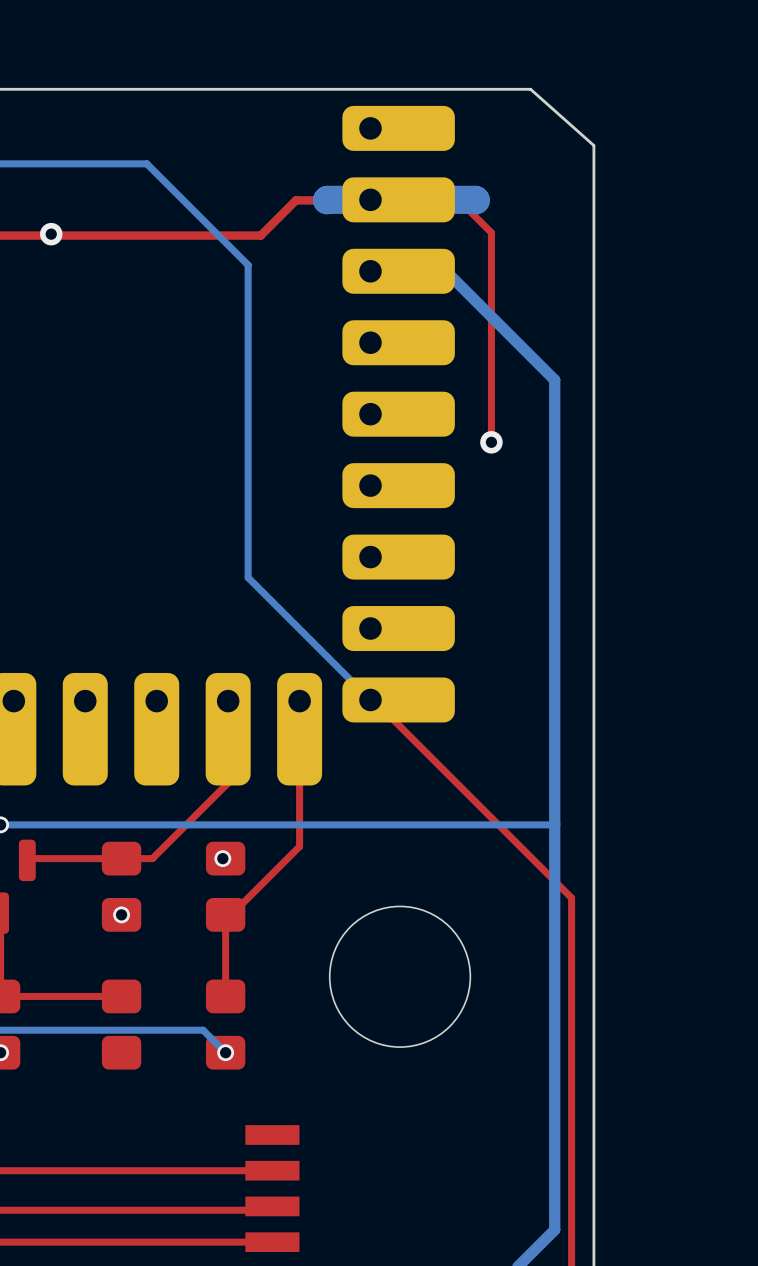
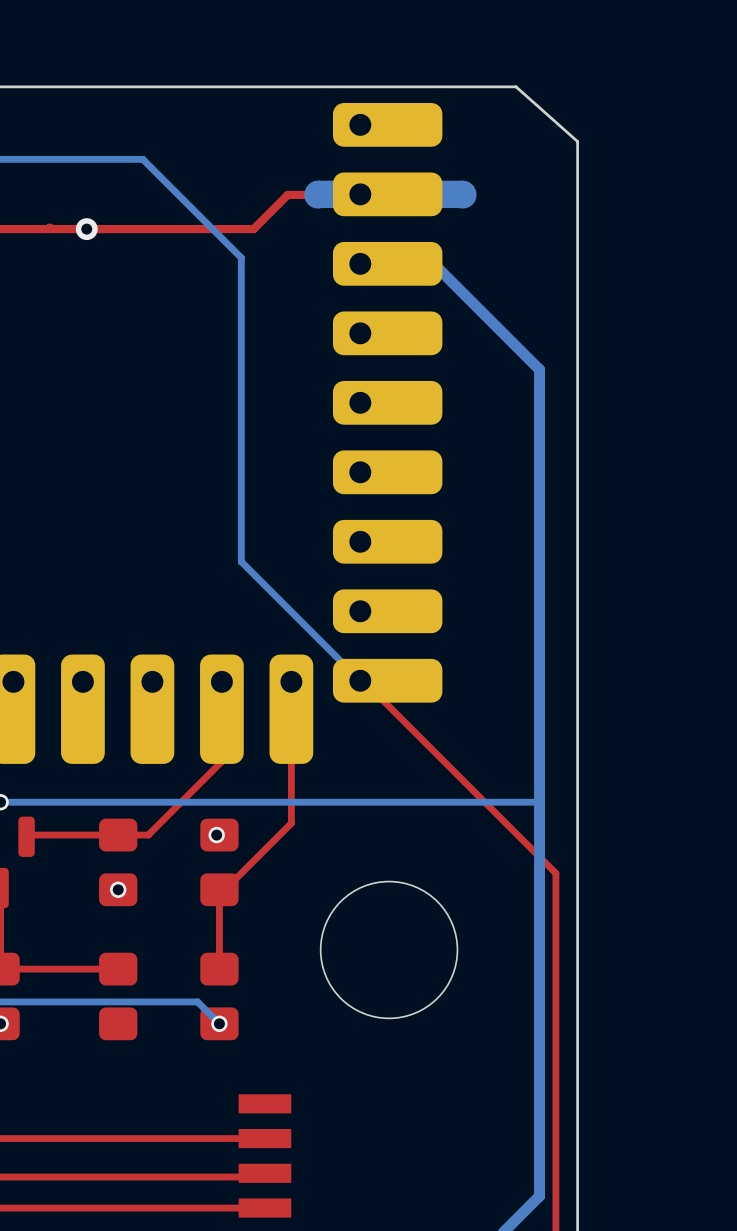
top track: (370, 199) (458, 199) (491, 232) (491, 442) -> none
via position: (51, 234) -> (86, 229)
via: (491, 442) -> none

